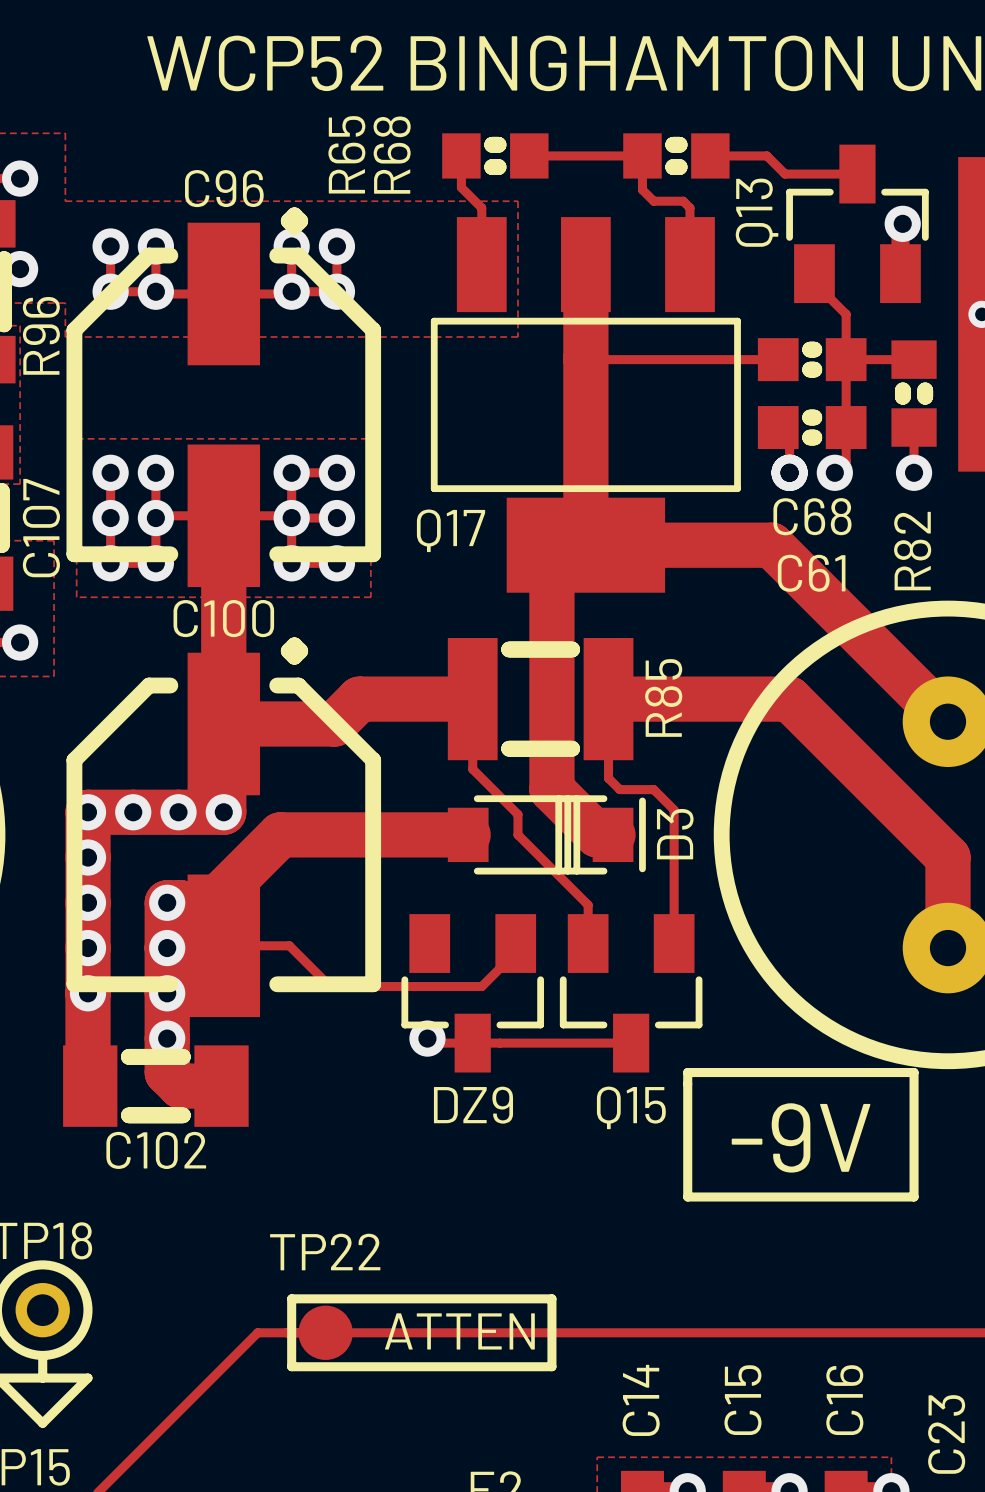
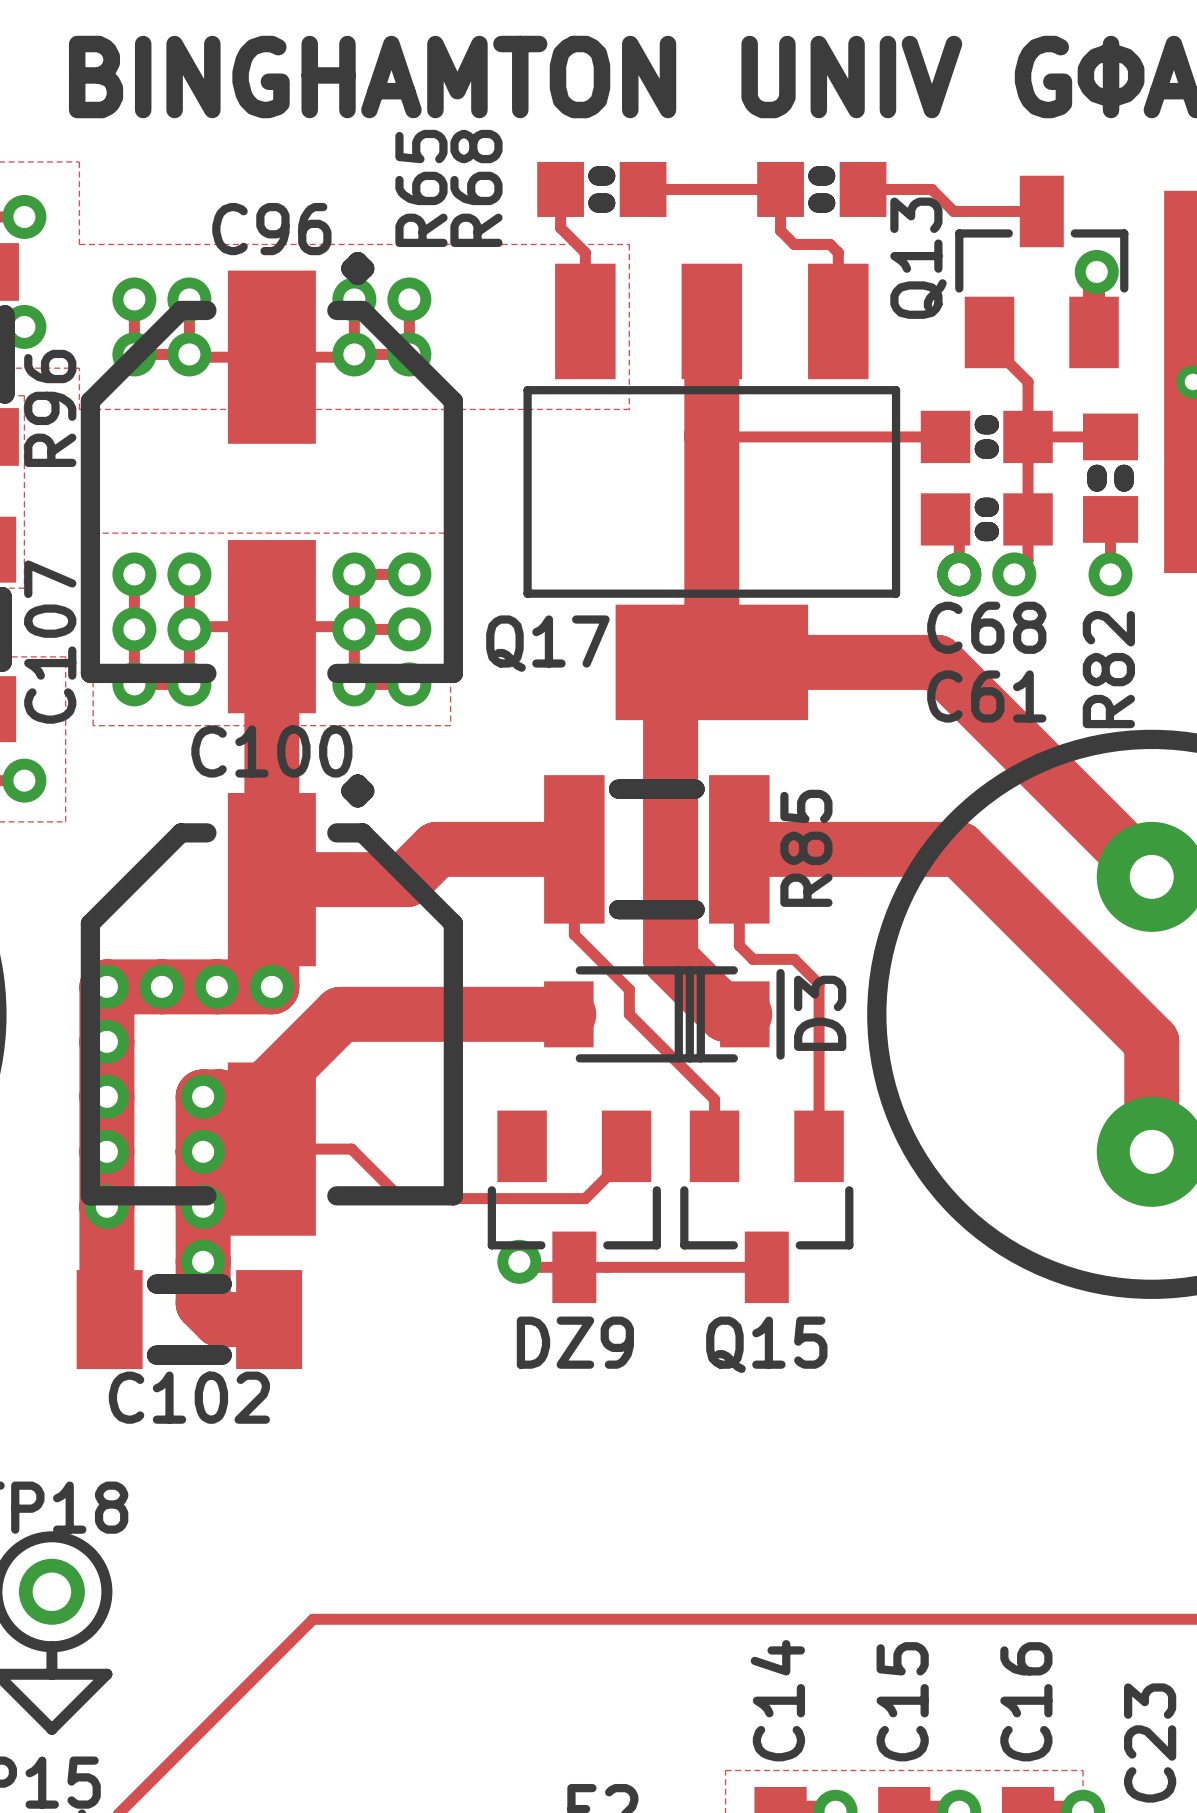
line: (687, 1072) (914, 1072) (914, 1197) (687, 1197) (687, 1072) -> none
text: -9V (801, 1137) -> none
line: (291, 1298) (291, 1366) (551, 1366) (551, 1298) (291, 1298) -> none
text: ATTEN (459, 1331) -> none
TP22: (325, 1332) -> none

